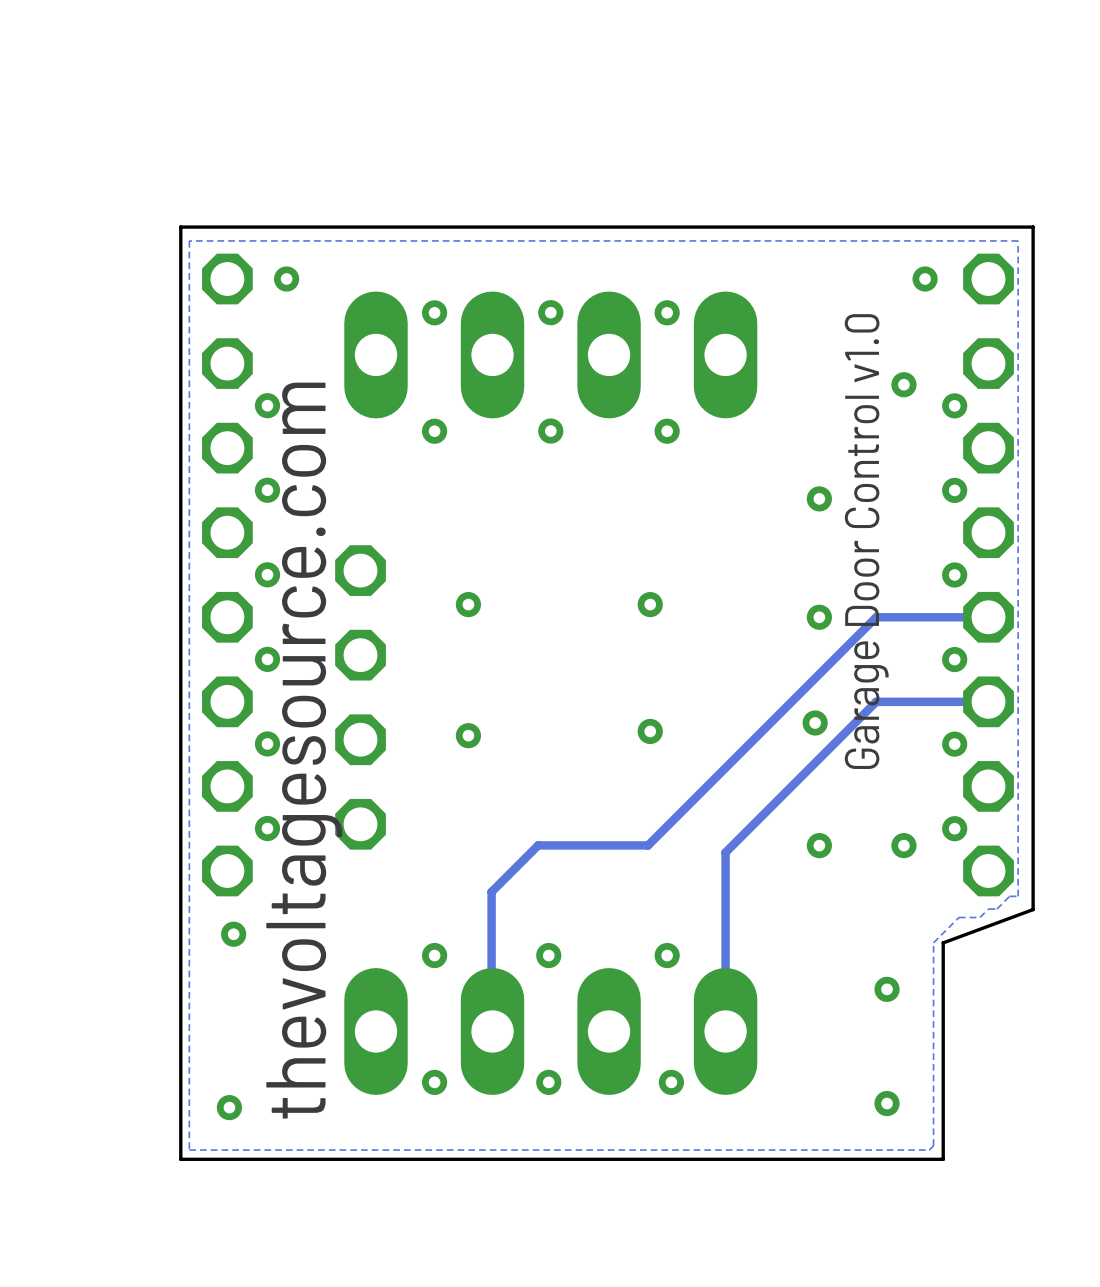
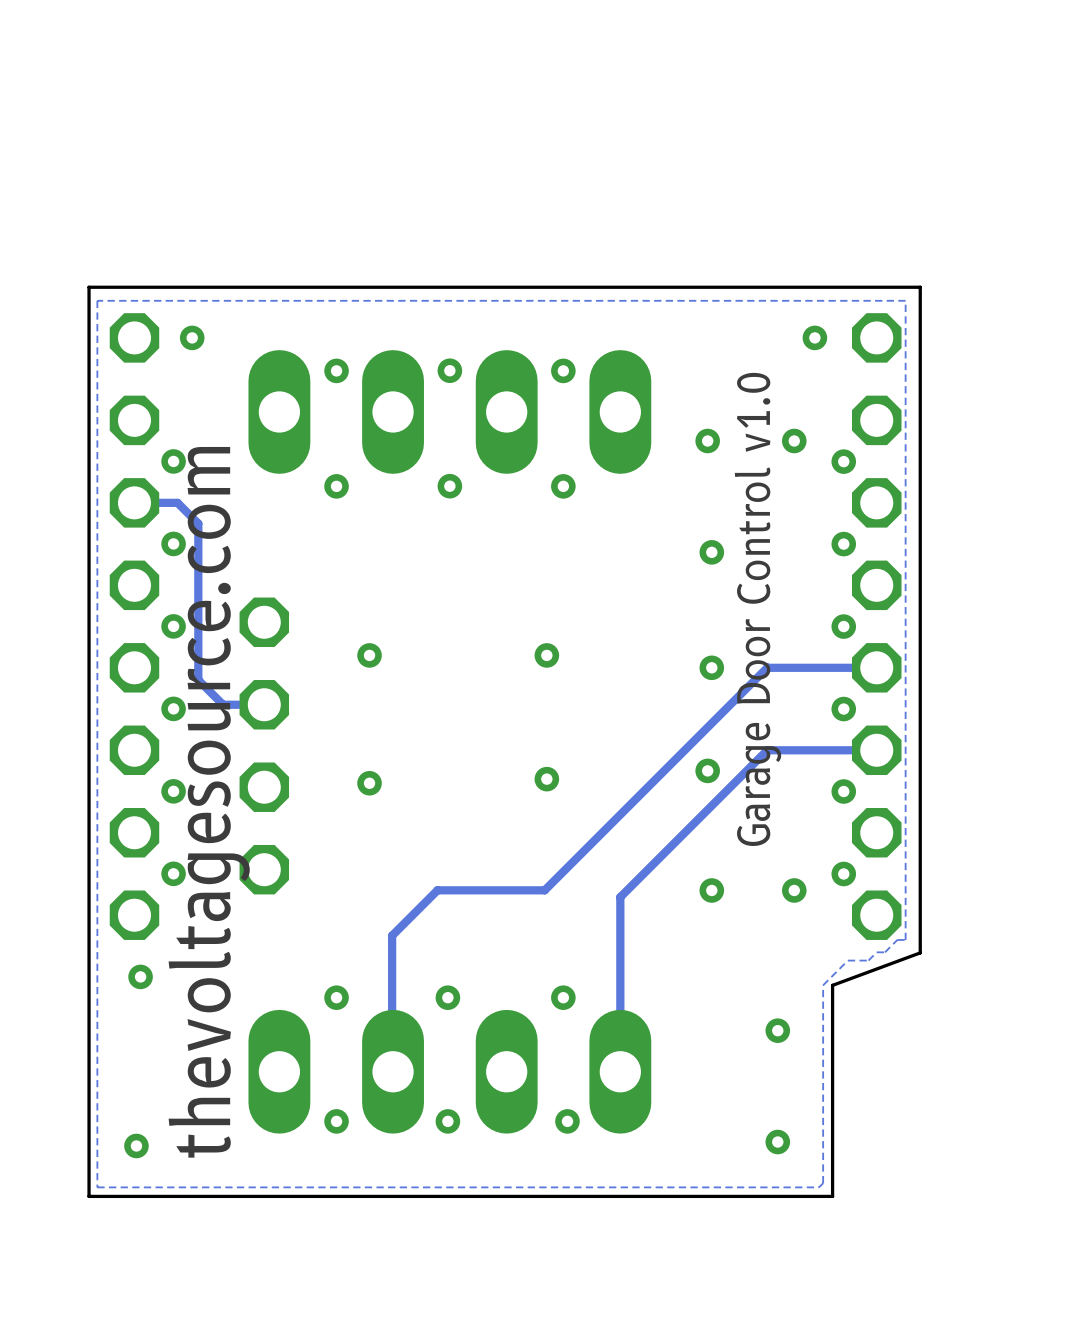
via: none -> (707, 441)
track: none -> (134, 502) (177, 502) (198, 523) (198, 680) (223, 704) (264, 704)

